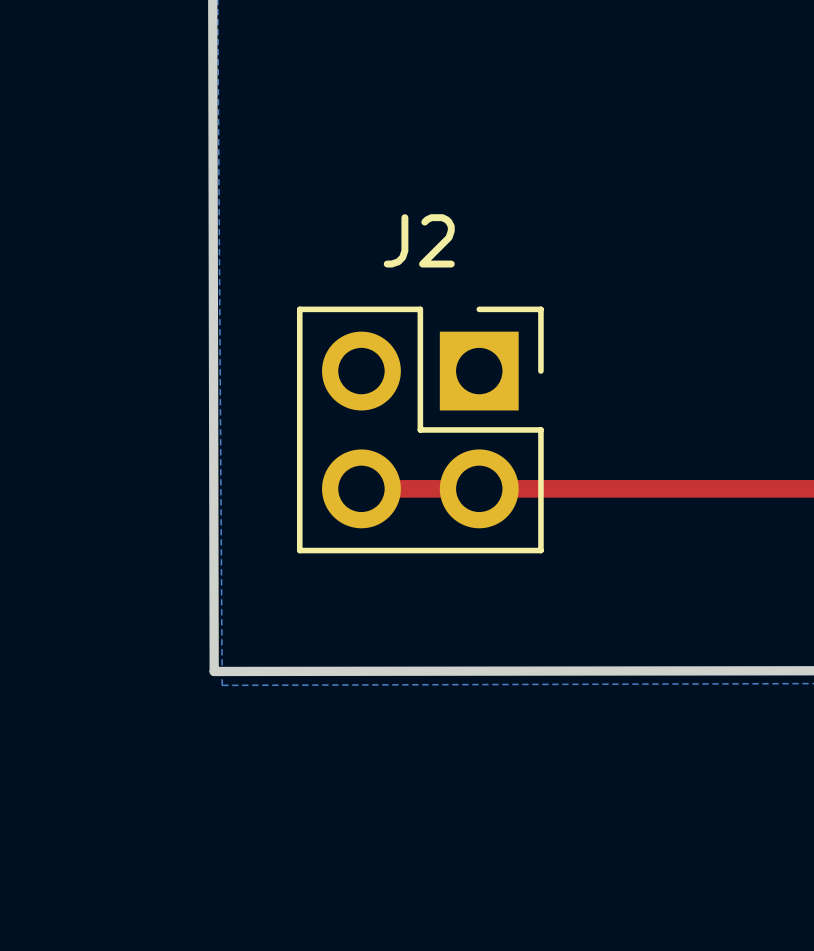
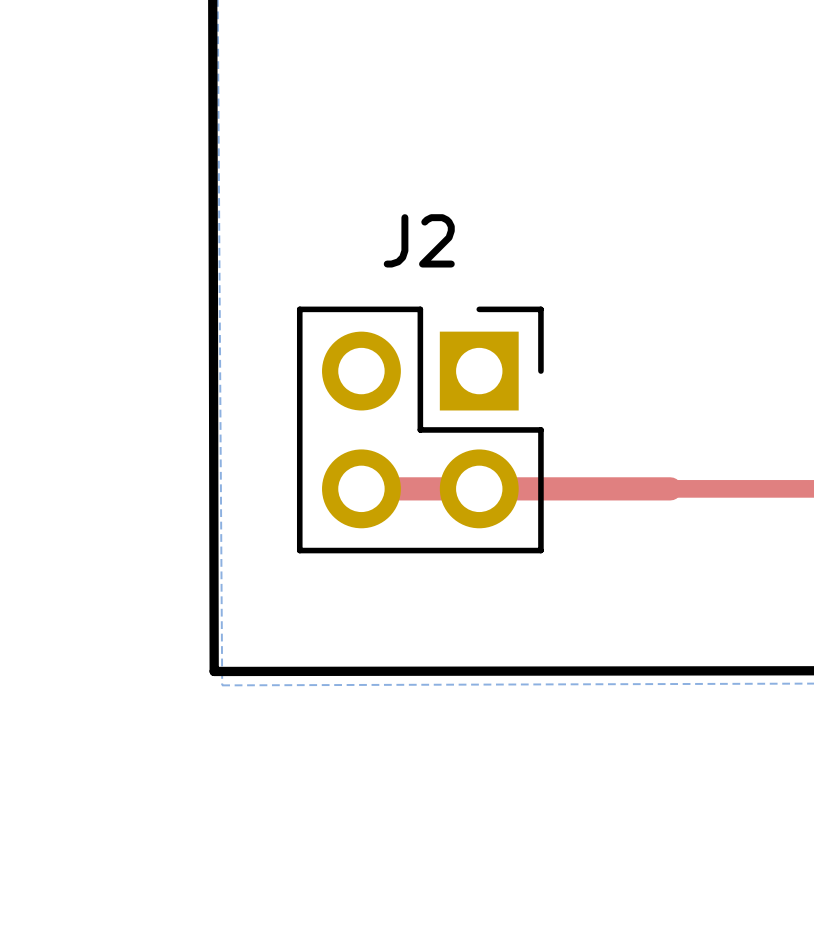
top track width: thin (361, 488) (670, 488) -> thick (361, 488) (670, 488)

